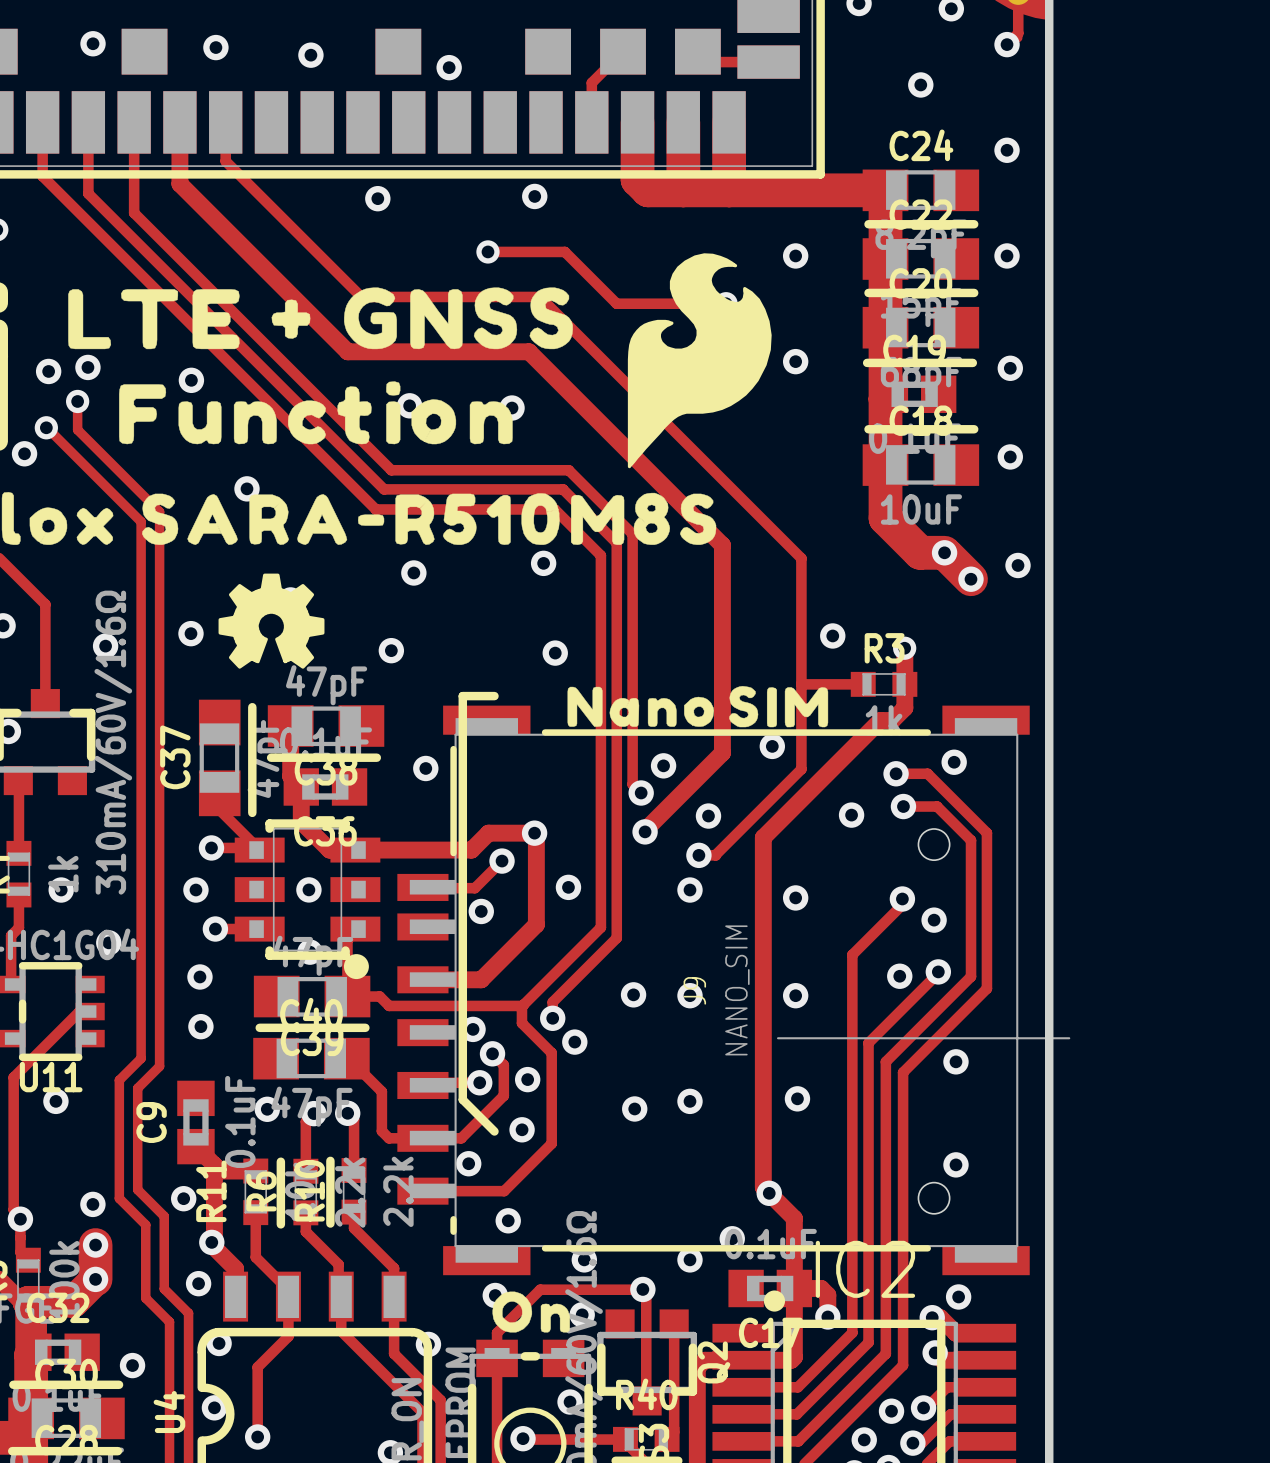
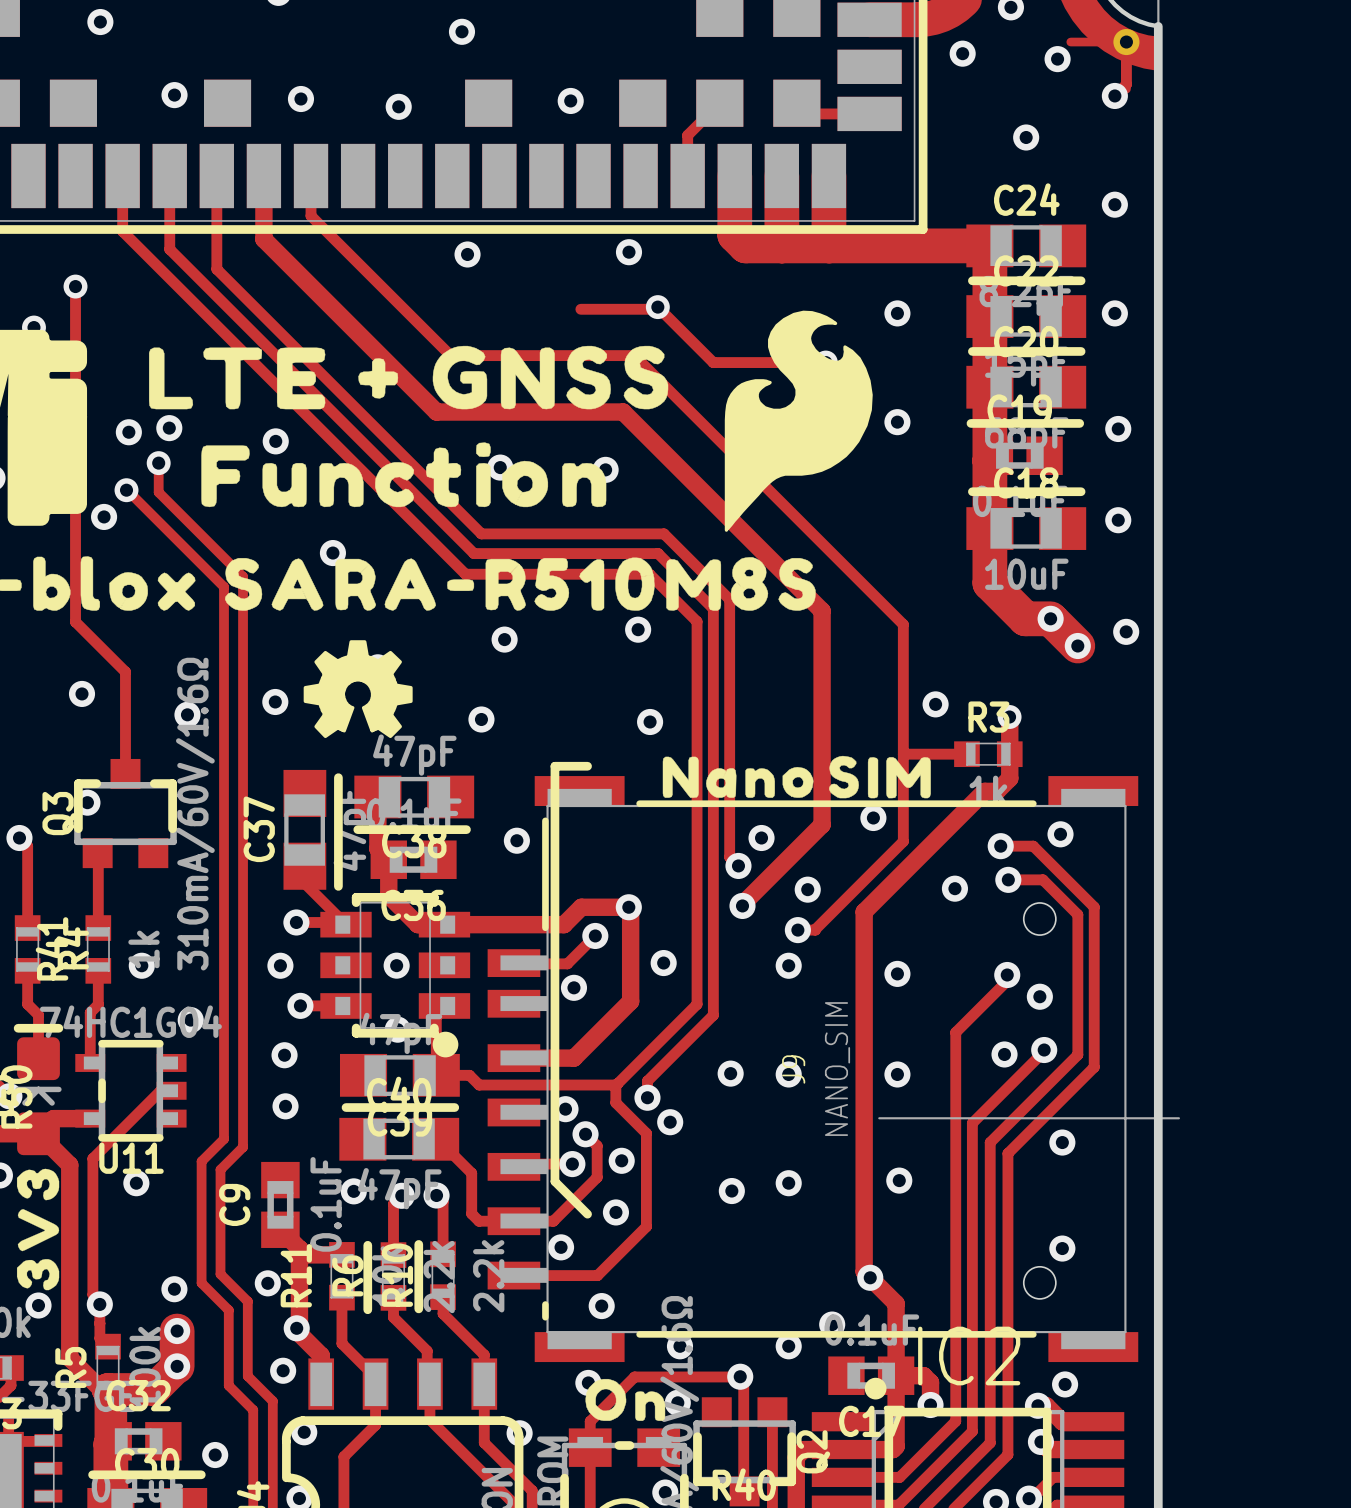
via position: (449, 67) -> (570, 100)
via position: (487, 251) -> (657, 307)

